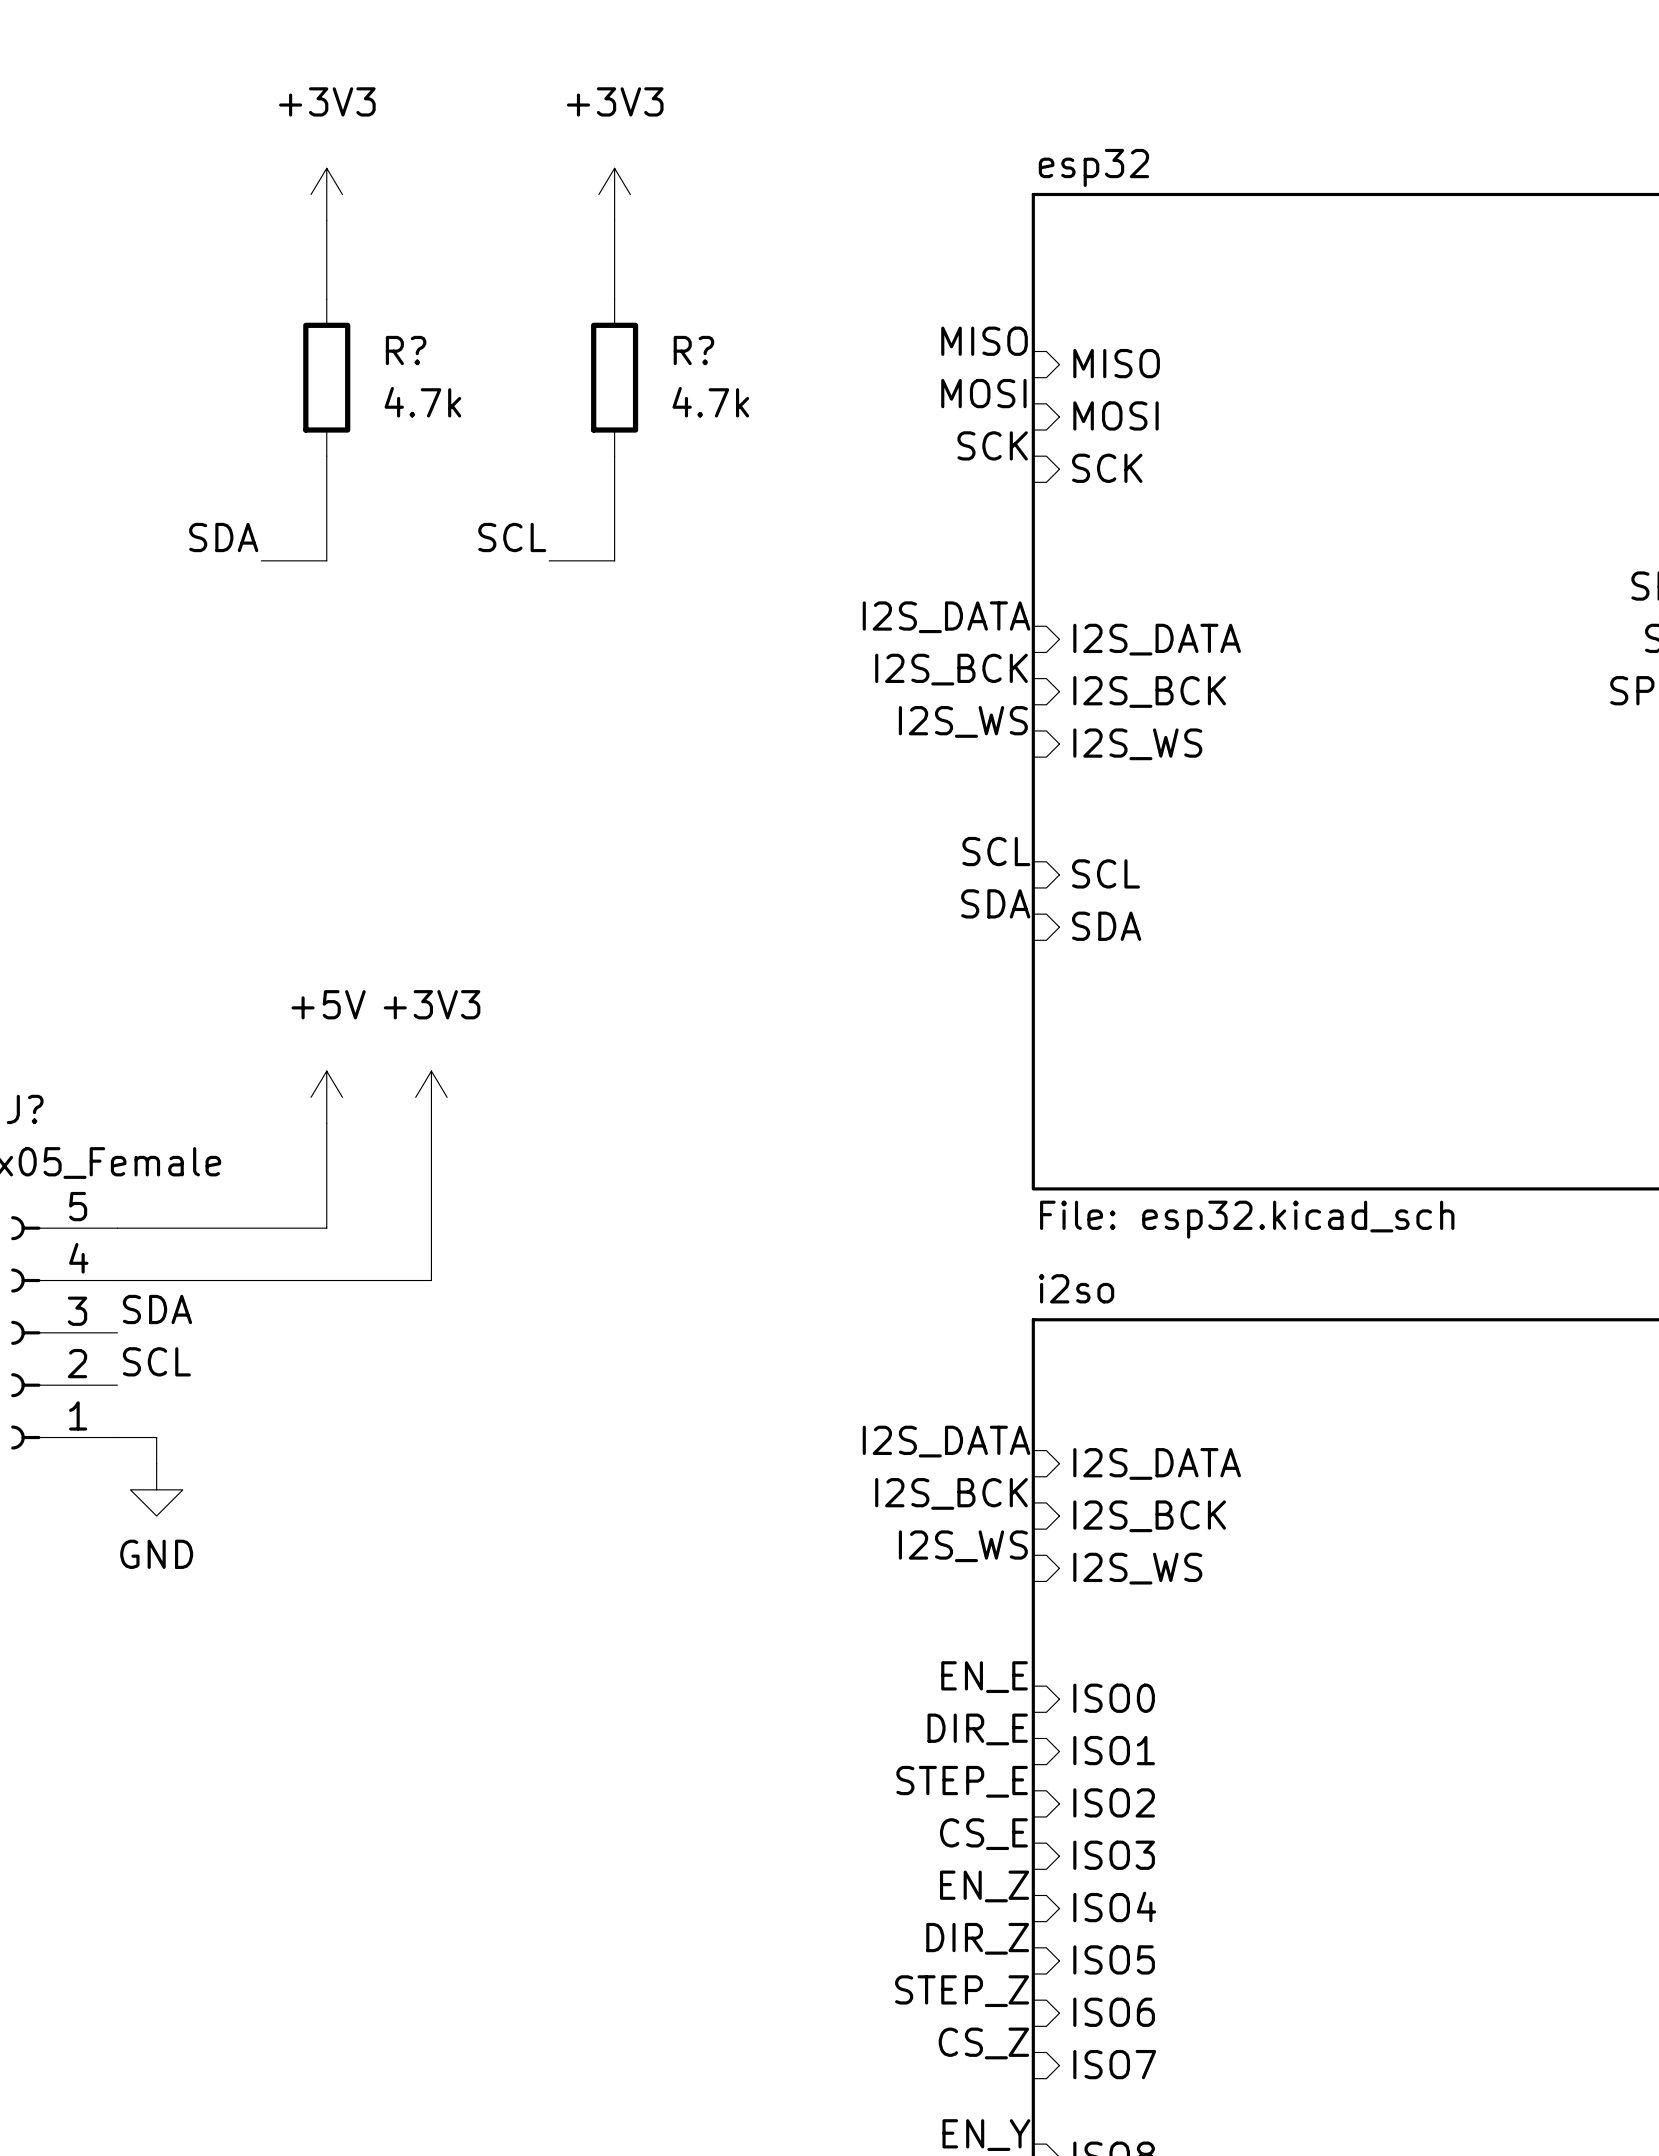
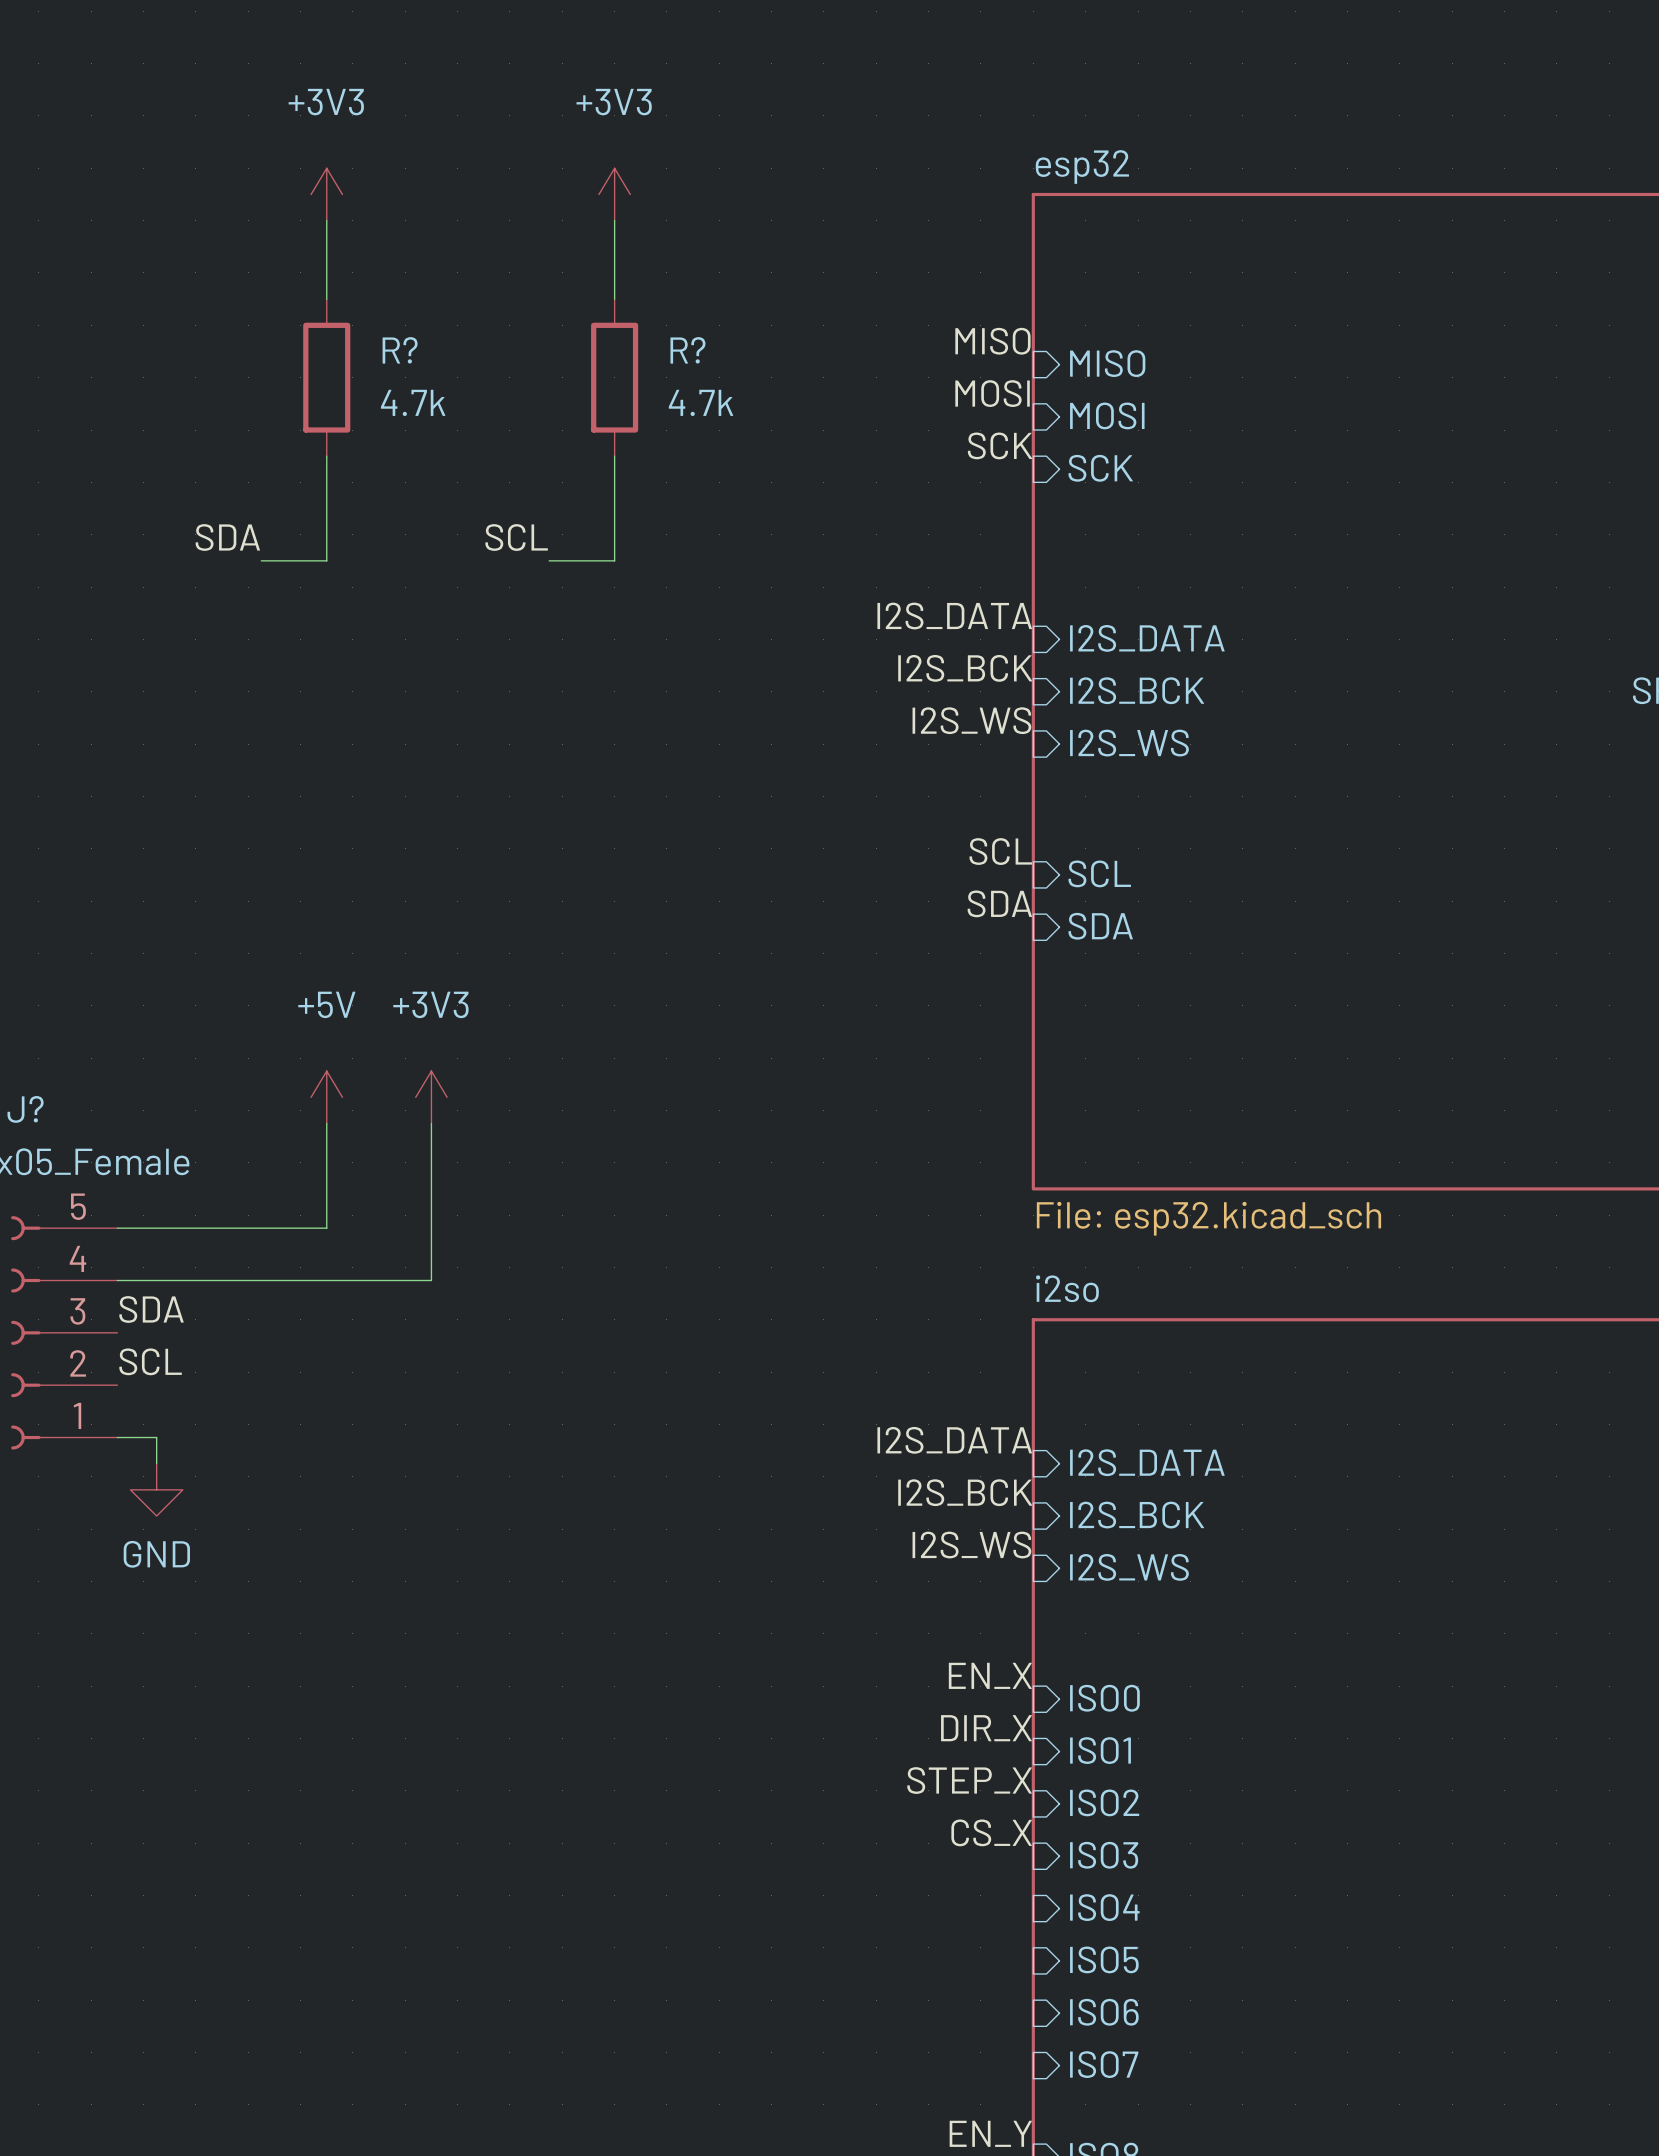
label: EN_E (984, 1677) -> EN_X (990, 1675)
label: DIR_E (977, 1729) -> DIR_X (986, 1728)
label: STEP_E (962, 1781) -> STEP_X (969, 1780)
label: CS_E (983, 1834) -> CS_X (991, 1832)
label: EN_Z (984, 1886) -> none
label: DIR_Z (977, 1938) -> none
label: STEP_Z (962, 1991) -> none
label: CS_Z (983, 2043) -> none

